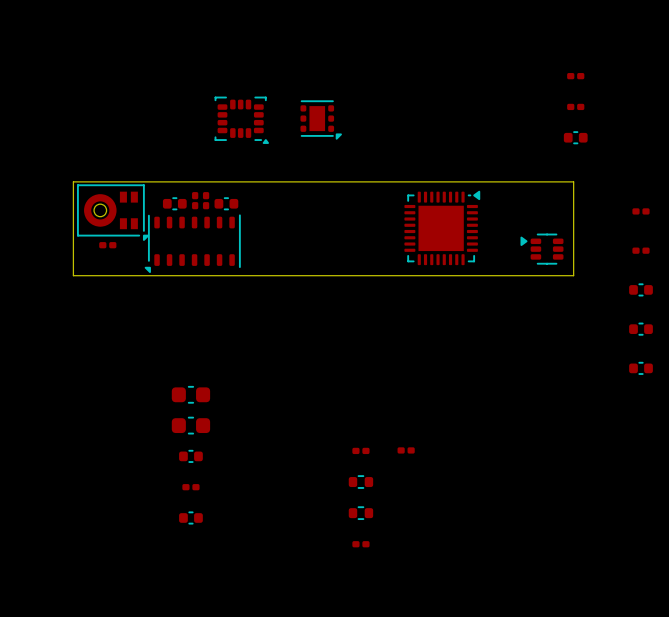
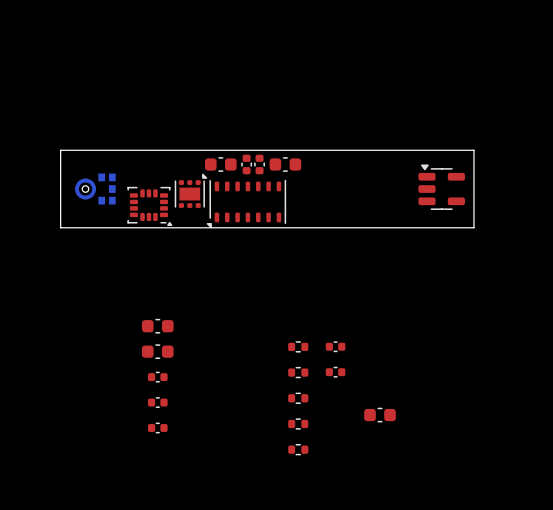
part: (575, 76) -> none
part: (575, 106) -> none
part rotation: 0° (321, 119) -> 90° counterclockwise (190, 190)
part position: (321, 119) -> (190, 190)
part: (241, 120) -> none
part: (575, 137) -> none
part: none -> (220, 164)
part: none -> (246, 164)
part: none -> (259, 164)
part: none -> (285, 164)
part: (195, 200) -> none
part: (206, 200) -> none
part: (174, 203) -> none
part: (226, 203) -> none
part: (641, 211) -> none
part: (113, 212) -> none
part footprint: [144, 214, 241, 274] -> [127, 186, 173, 226]
part: none -> (441, 187)
part: (442, 227) -> none
part: none -> (95, 189)
part: (107, 245) -> none
part: none -> (246, 203)
part: (541, 249) -> none
part: (641, 250) -> none
part: (641, 289) -> none
part: (641, 329) -> none
part: (641, 368) -> none
part: none -> (298, 346)
part: none -> (335, 346)
part footprint: [352, 447, 370, 455] -> [288, 366, 309, 379]
part footprint: [397, 447, 415, 454] -> [325, 366, 346, 378]
part footprint: [182, 484, 200, 491] -> [147, 397, 168, 408]
part: none -> (380, 415)
part footprint: [352, 541, 370, 548] -> [288, 444, 309, 456]

